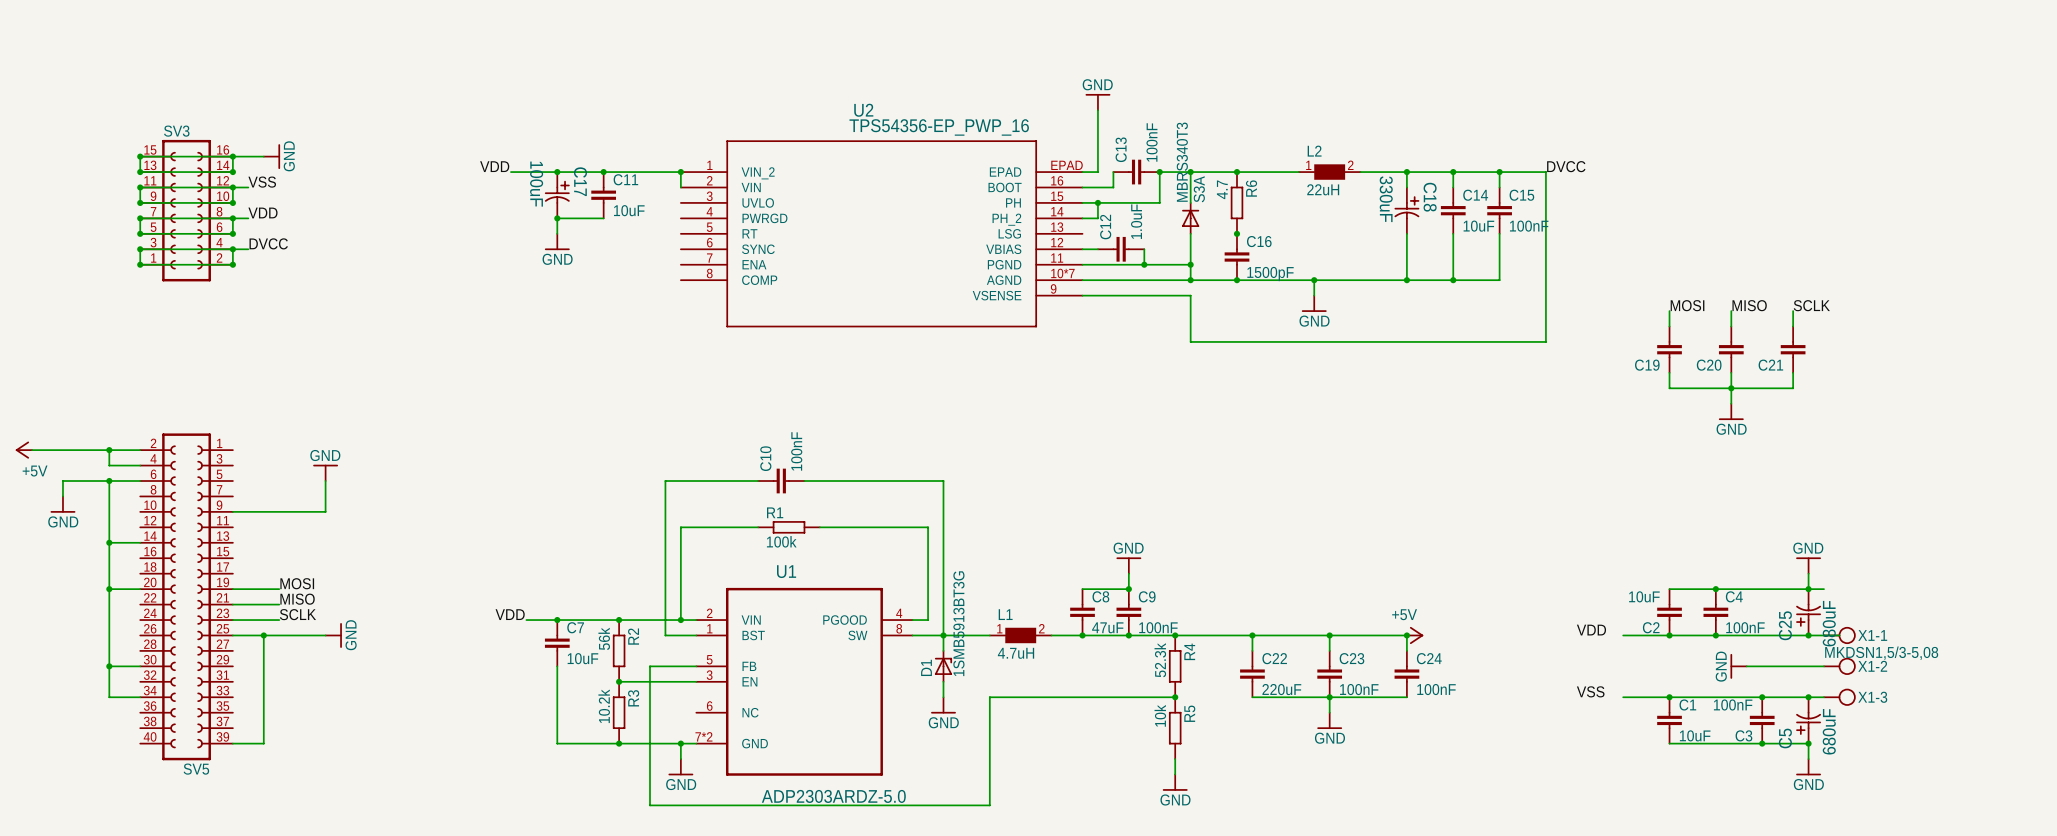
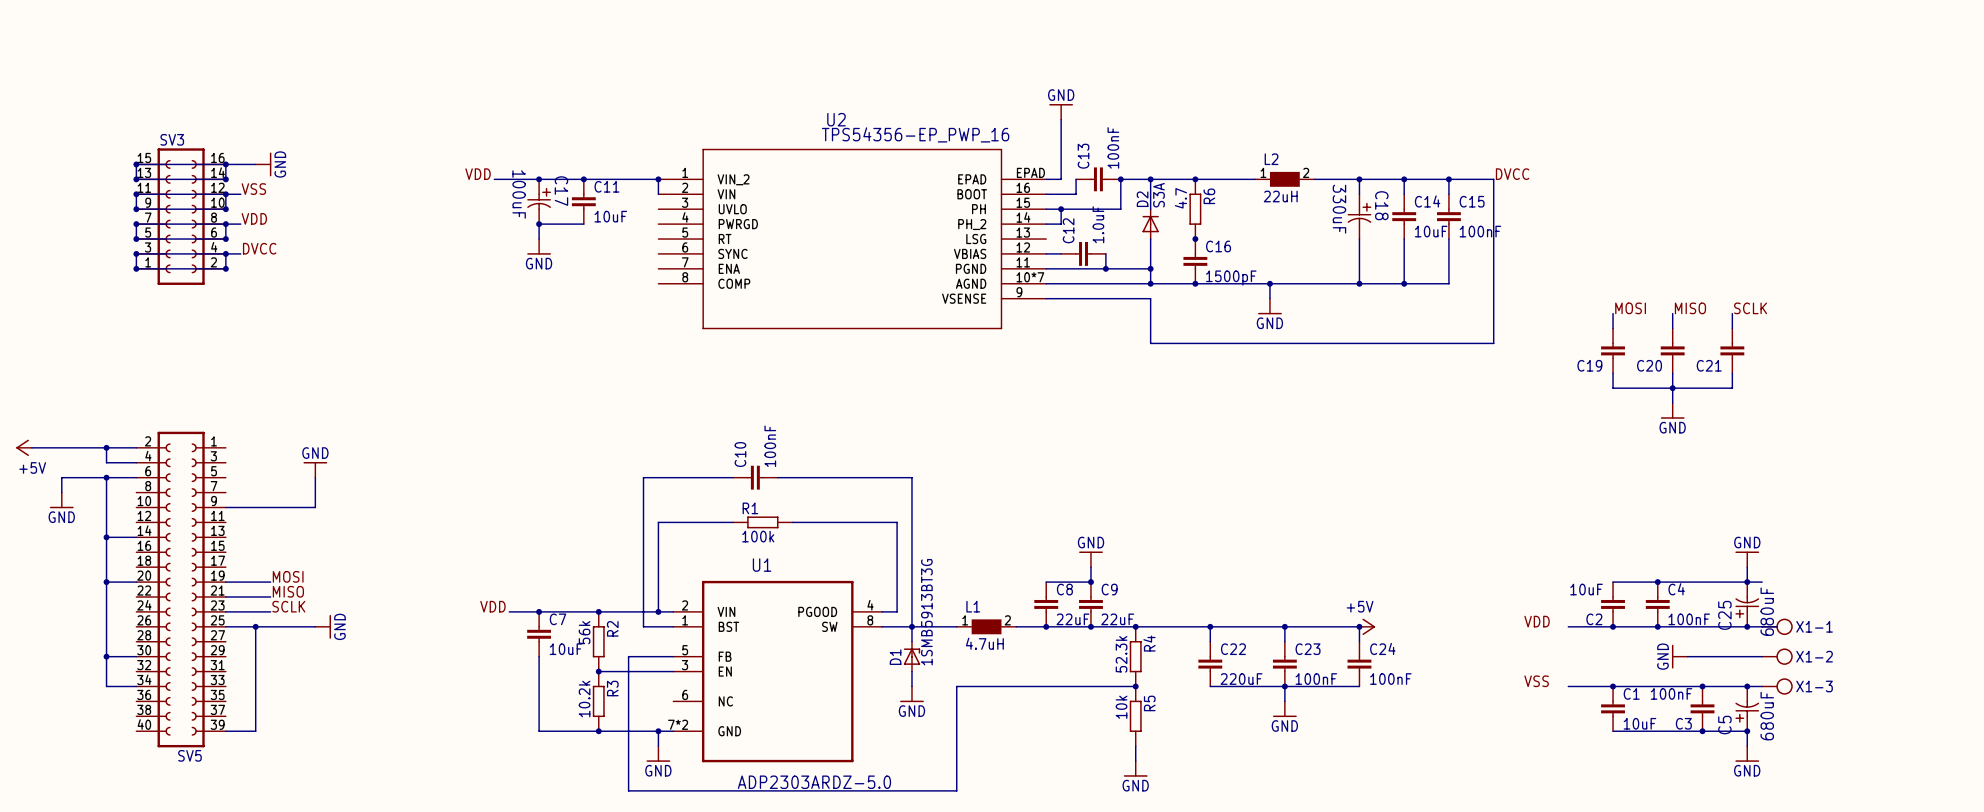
MBRS340T3 name: MBRS340T3 (1182, 162) -> D2 (1142, 199)
C8 value: 47uF (1107, 627) -> 22uF (1072, 619)
C9 value: 100nF (1158, 627) -> 22uF (1117, 619)
X1-1 value: MKDSN1,5/3-5,08 (1881, 653) -> none

